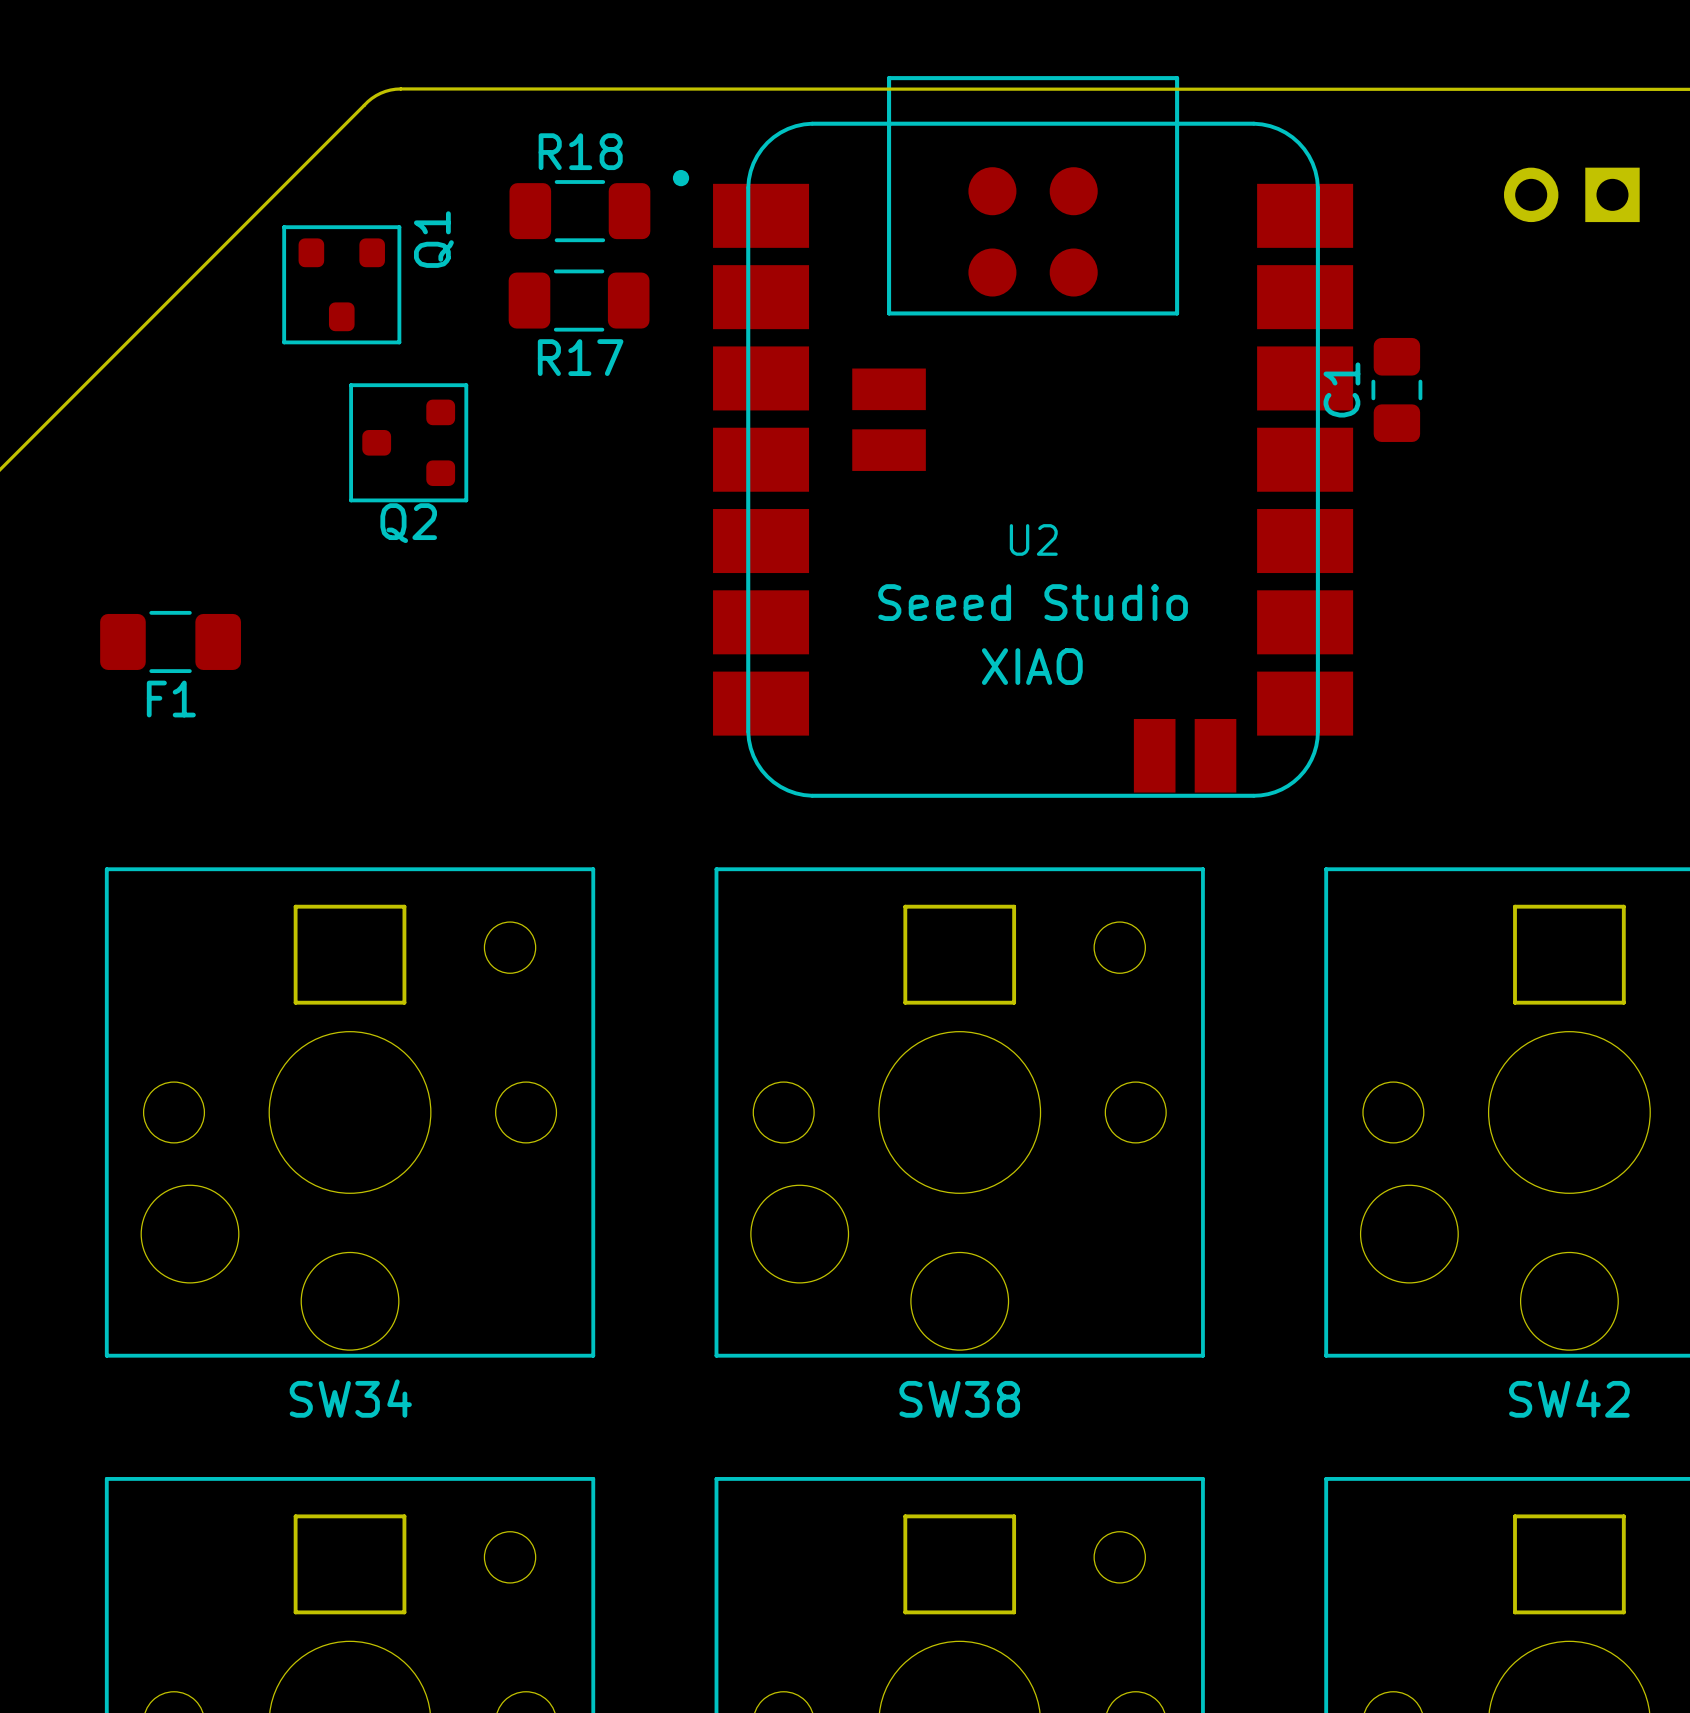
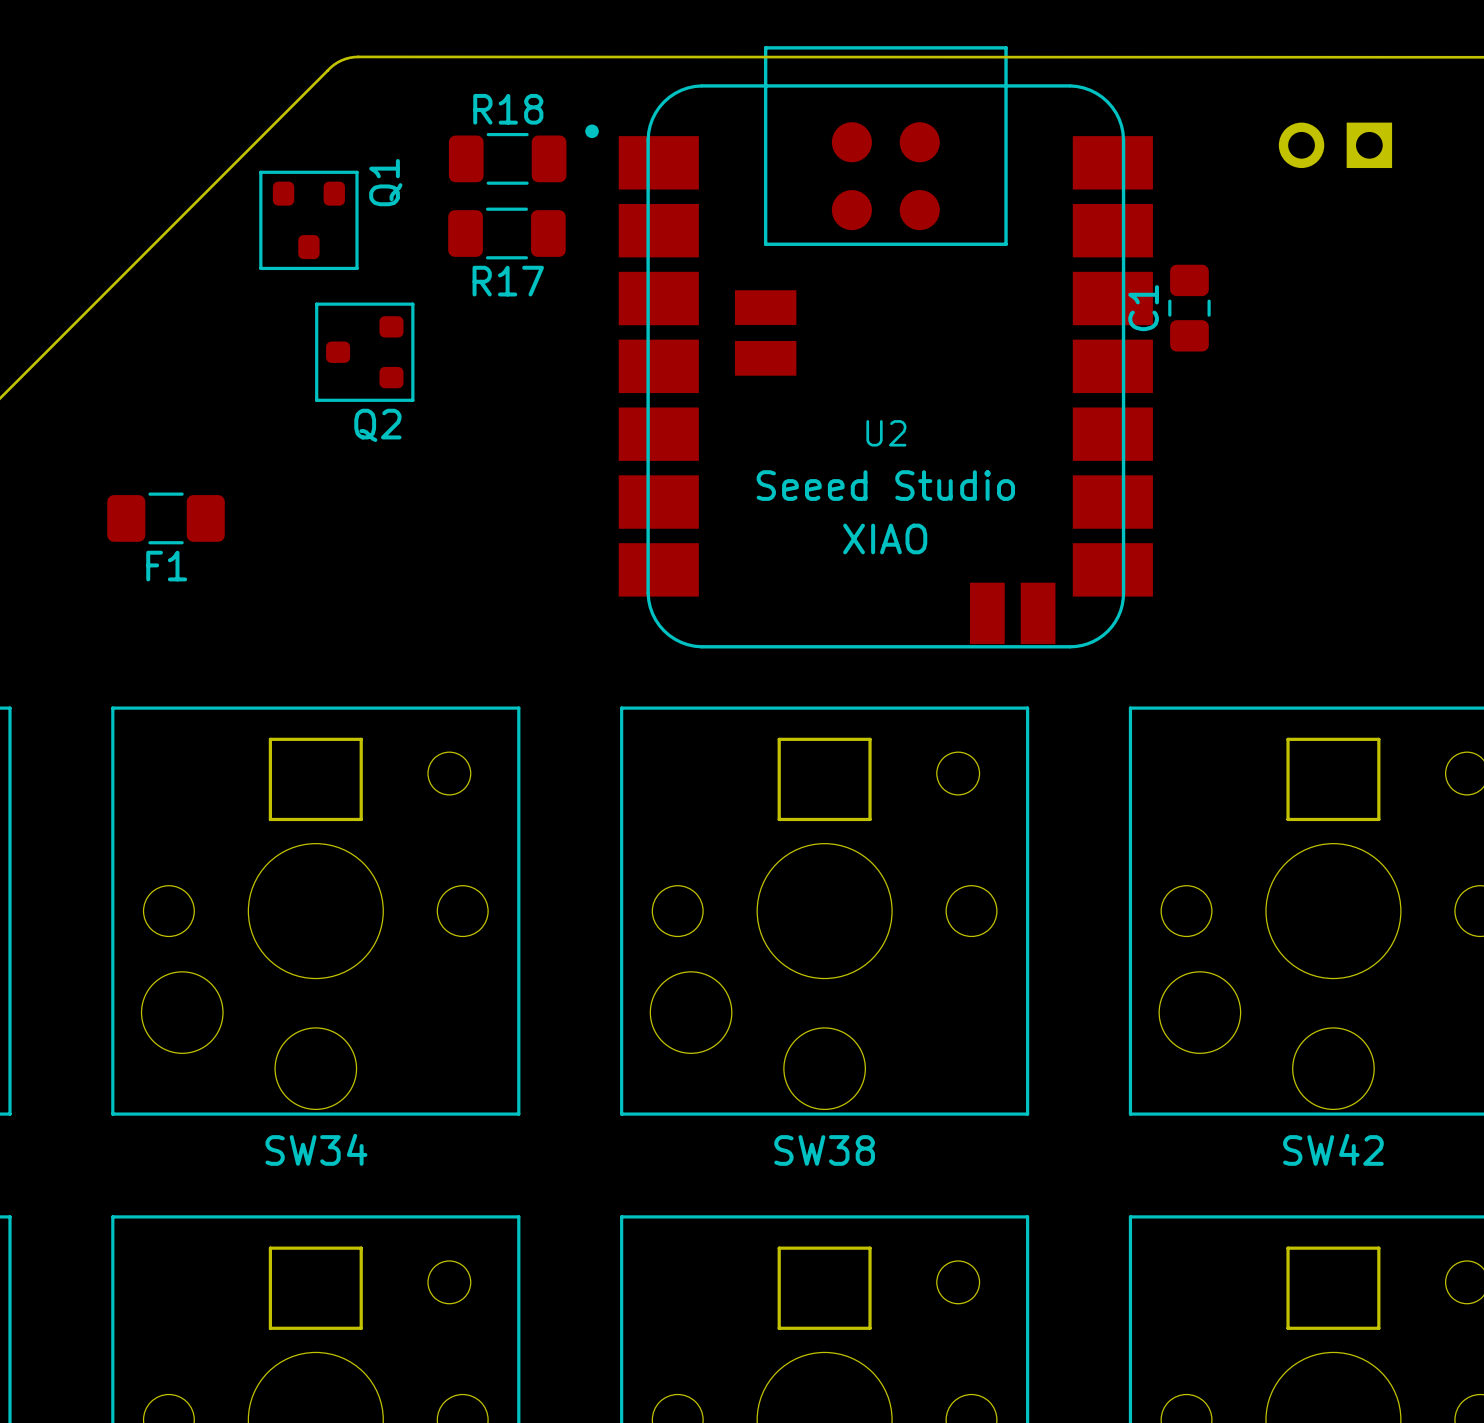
Q2 name position: Q2 (408, 523) -> Q2 (377, 425)

